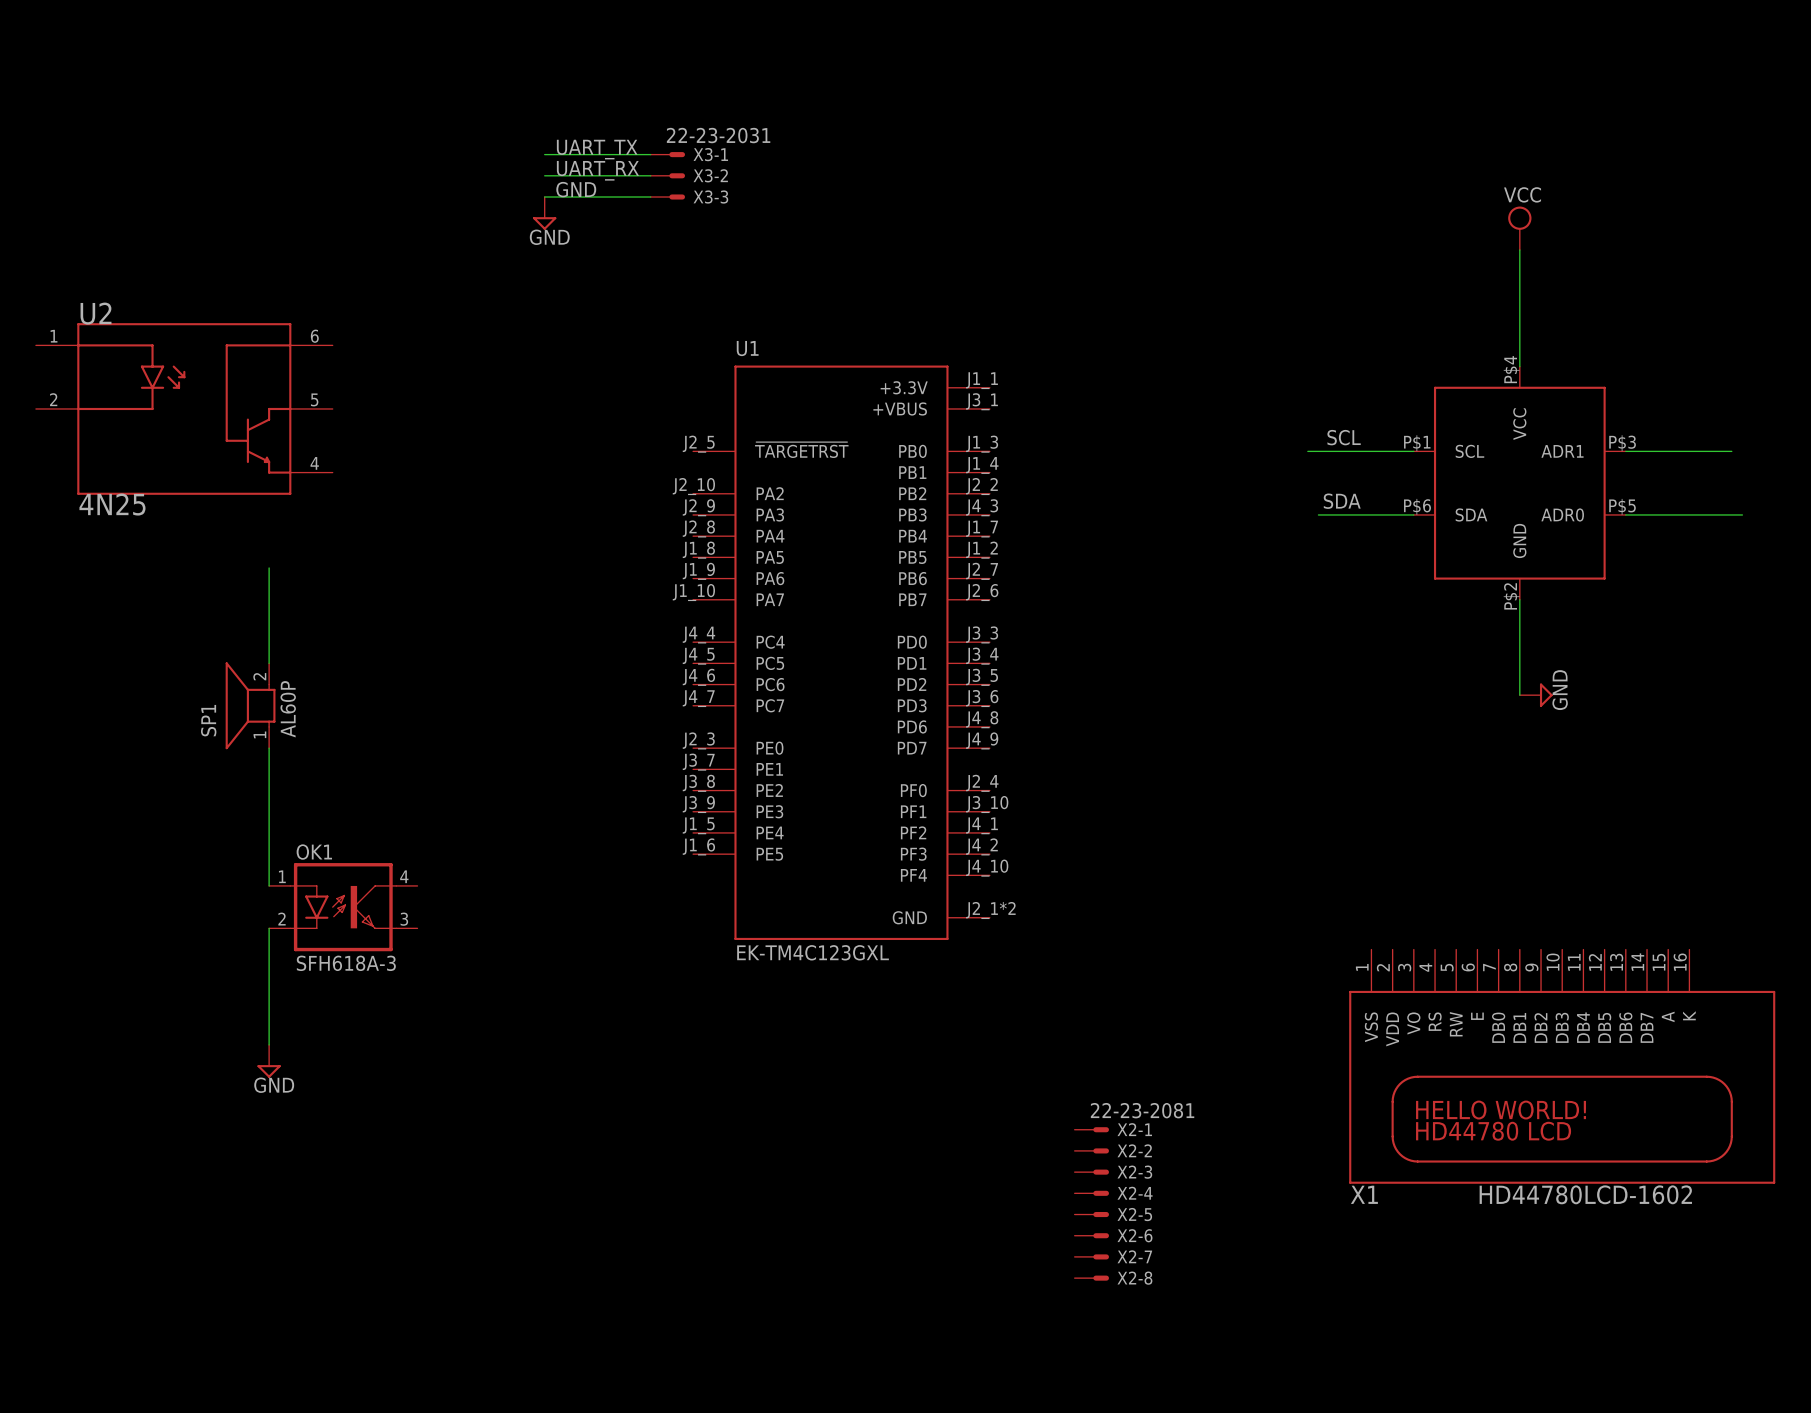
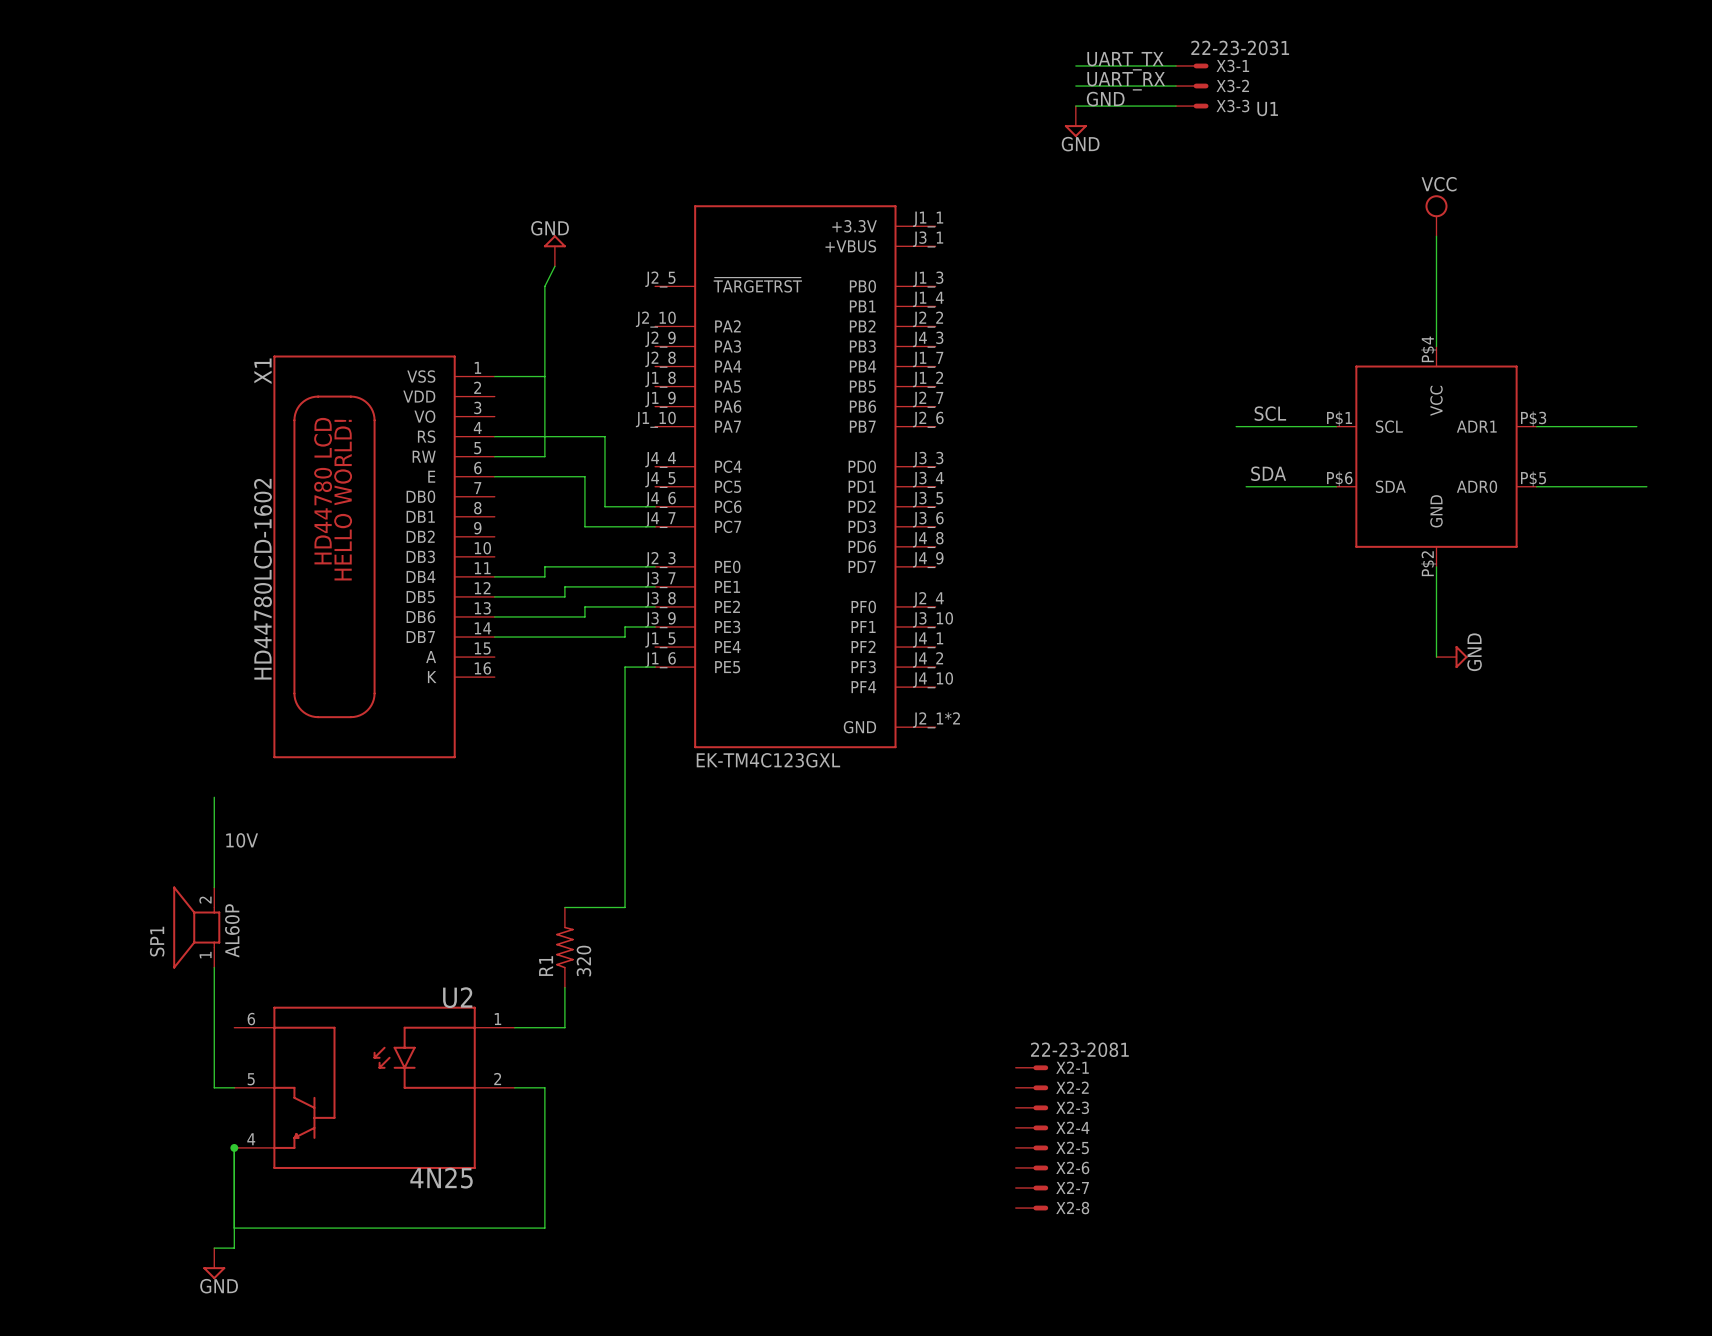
label: none -> UART_TX (1125, 61)
wire: none -> (1075, 65) (1176, 65)
label: none -> UART_RX (1126, 81)
wire: none -> (1075, 86) (1176, 86)
label: none -> GND (1105, 99)
wire: none -> (1075, 106) (1176, 106)
power symbol: none -> GND (1075, 121)
label: UART_TX (597, 149) -> none
wire: (544, 154) (650, 154) -> none
X3-1 position: (667, 154) -> (1192, 65)
label: UART_RX (597, 170) -> none
wire: (544, 175) (650, 175) -> none
X3-2 position: (667, 175) -> (1192, 86)
label: GND (576, 189) -> none
wire: (544, 197) (650, 197) -> none
X3-3 position: (667, 197) -> (1192, 106)
power symbol position: GND (544, 213) -> GND (554, 250)
power symbol rotation: 0° (544, 223) -> 180° (554, 241)
wire: none -> (554, 266) (544, 286) (544, 456) (494, 456)
U1 name position: U1 (747, 348) -> U1 (1267, 109)
wire: none -> (494, 376) (544, 376)
U2 flip: as is (184, 408) -> left-right (374, 1087)
U2 position: (184, 408) -> (374, 1087)
wire: none -> (494, 436) (604, 436) (604, 506) (655, 506)
wire: none -> (494, 476) (584, 476) (584, 526) (655, 526)
wire: (269, 567) (269, 663) -> none
wire: none -> (655, 566) (544, 566) (544, 576) (494, 576)
wire: none -> (655, 586) (564, 586) (564, 596) (494, 596)
wire: none -> (655, 606) (584, 606) (584, 616) (494, 616)
U1 position: (841, 652) -> (795, 476)
wire: none -> (655, 626) (625, 626) (625, 637) (494, 637)
SP1 position: (250, 705) -> (196, 927)
wire: none -> (655, 667) (625, 667) (625, 907) (564, 907)
wire: (269, 748) (269, 885) -> none
wire: none -> (214, 797) (214, 887)
label: none -> 10V (242, 840)
OK1: SFH618A-3 (343, 907) -> none
wire: (269, 928) (269, 1044) -> none
X1 symbol: [1349, 949, 1776, 1184] -> [273, 355, 495, 759]
R1: none -> 320 (564, 947)
wire: none -> (214, 967) (214, 1087) (234, 1087)
wire: none -> (564, 987) (564, 1027) (514, 1027)
power symbol: GND (269, 1061) -> none
wire: none -> (514, 1087) (544, 1087) (544, 1228) (234, 1228)
X1 name position: X1 (1364, 1194) -> X1 (262, 371)
X1 value position: HD44780LCD-1602 (1585, 1194) -> HD44780LCD-1602 (262, 579)
wire: none -> (234, 1147) (234, 1248) (214, 1248)
junction: none -> (234, 1147)
power symbol: none -> GND (214, 1263)

